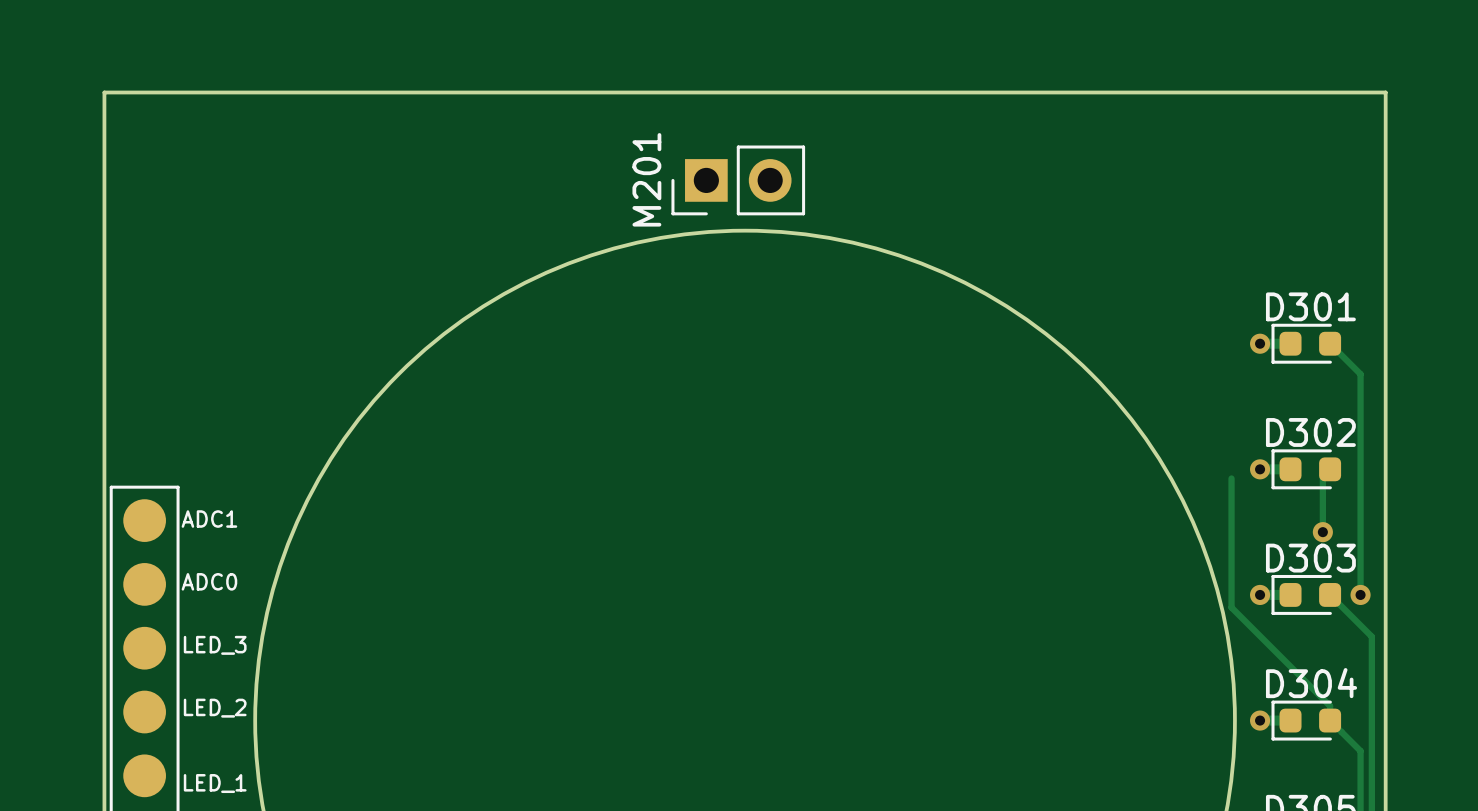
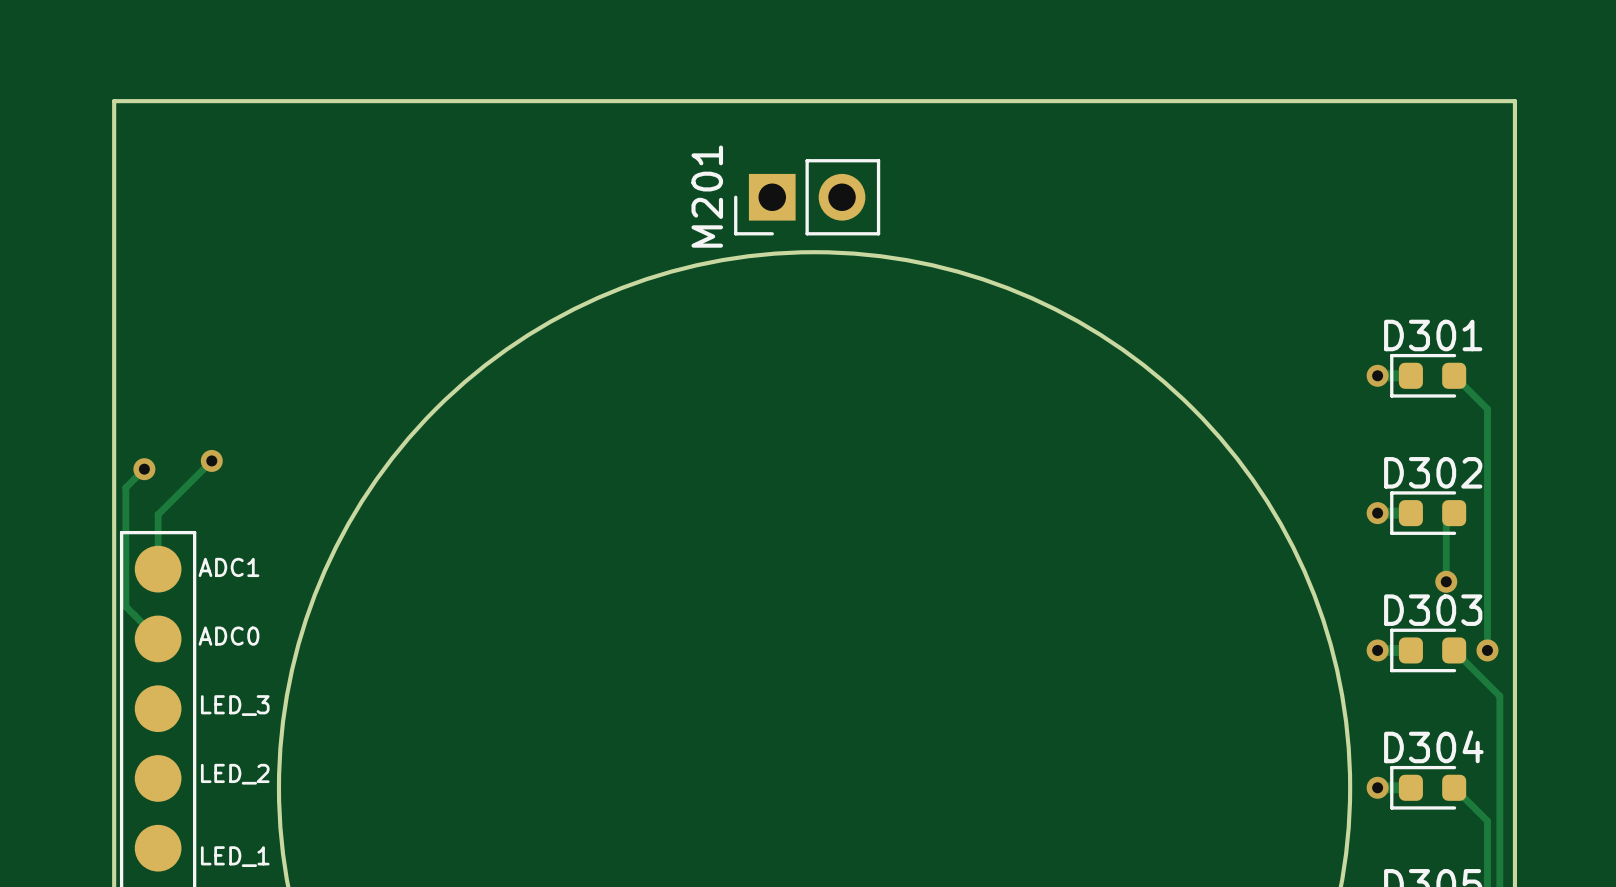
track: none -> (211, 460) (158, 514) (158, 569)
via: none -> (211, 460)
track: none -> (144, 469) (125, 487) (125, 606) (158, 638)
via: none -> (144, 469)
track: (1231, 478) (1231, 607) (1330, 706) (1330, 720) -> none

